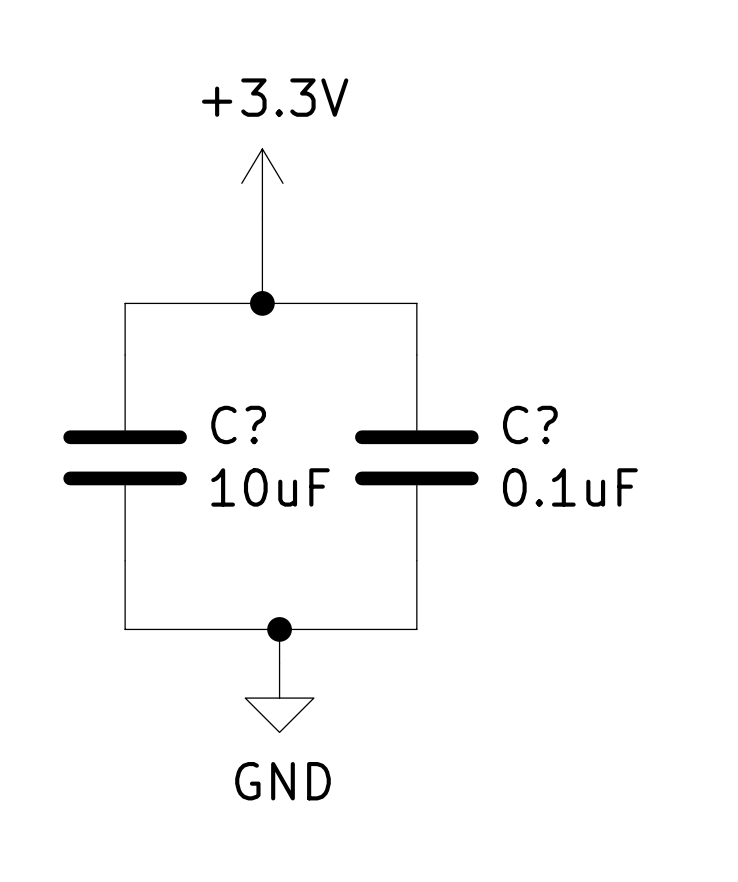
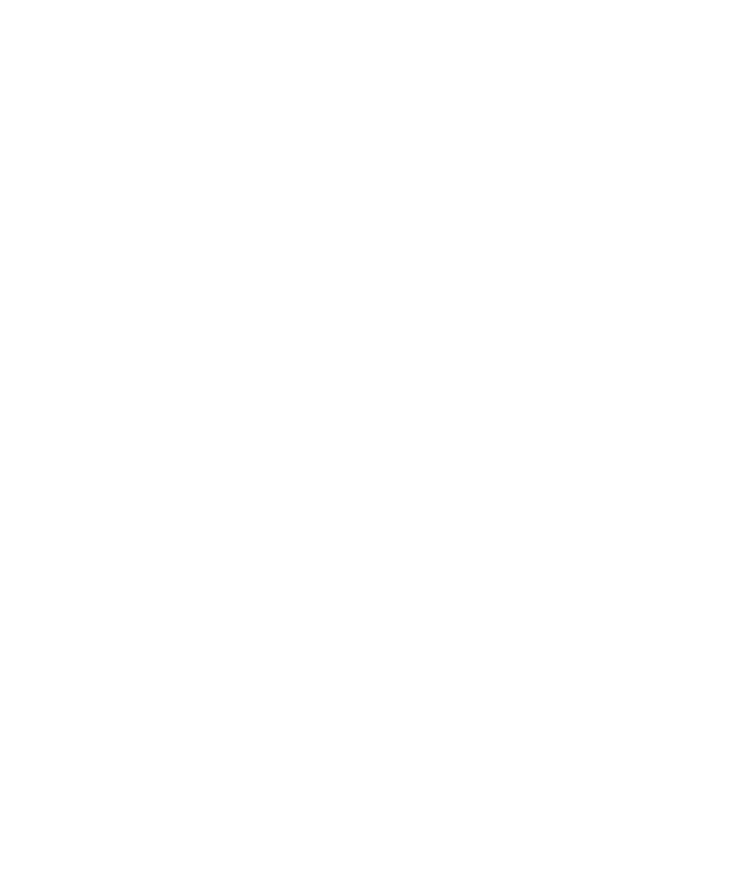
power symbol: +3.3V (262, 183) -> none
wire: (262, 217) (262, 303) -> none
junction: (262, 303) -> none
wire: (125, 354) (125, 303) (416, 303) (416, 354) -> none
C?: 10uF (125, 457) -> none
C?: 0.1uF (416, 457) -> none
wire: (125, 560) (125, 629) (416, 629) (416, 560) -> none
wire: (279, 629) (279, 663) -> none
junction: (279, 629) -> none
power symbol: GND (279, 698) -> none

